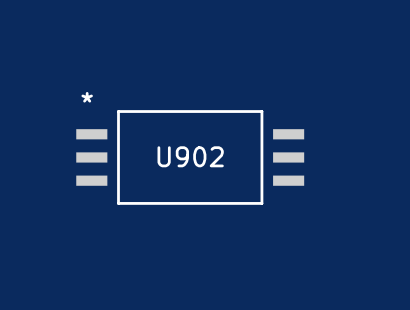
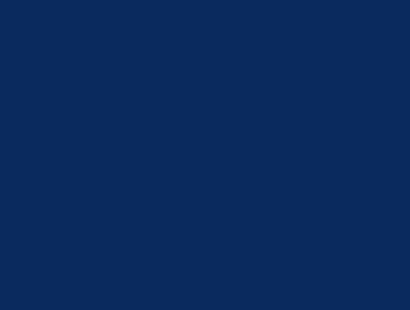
U902: (190, 157) -> none

